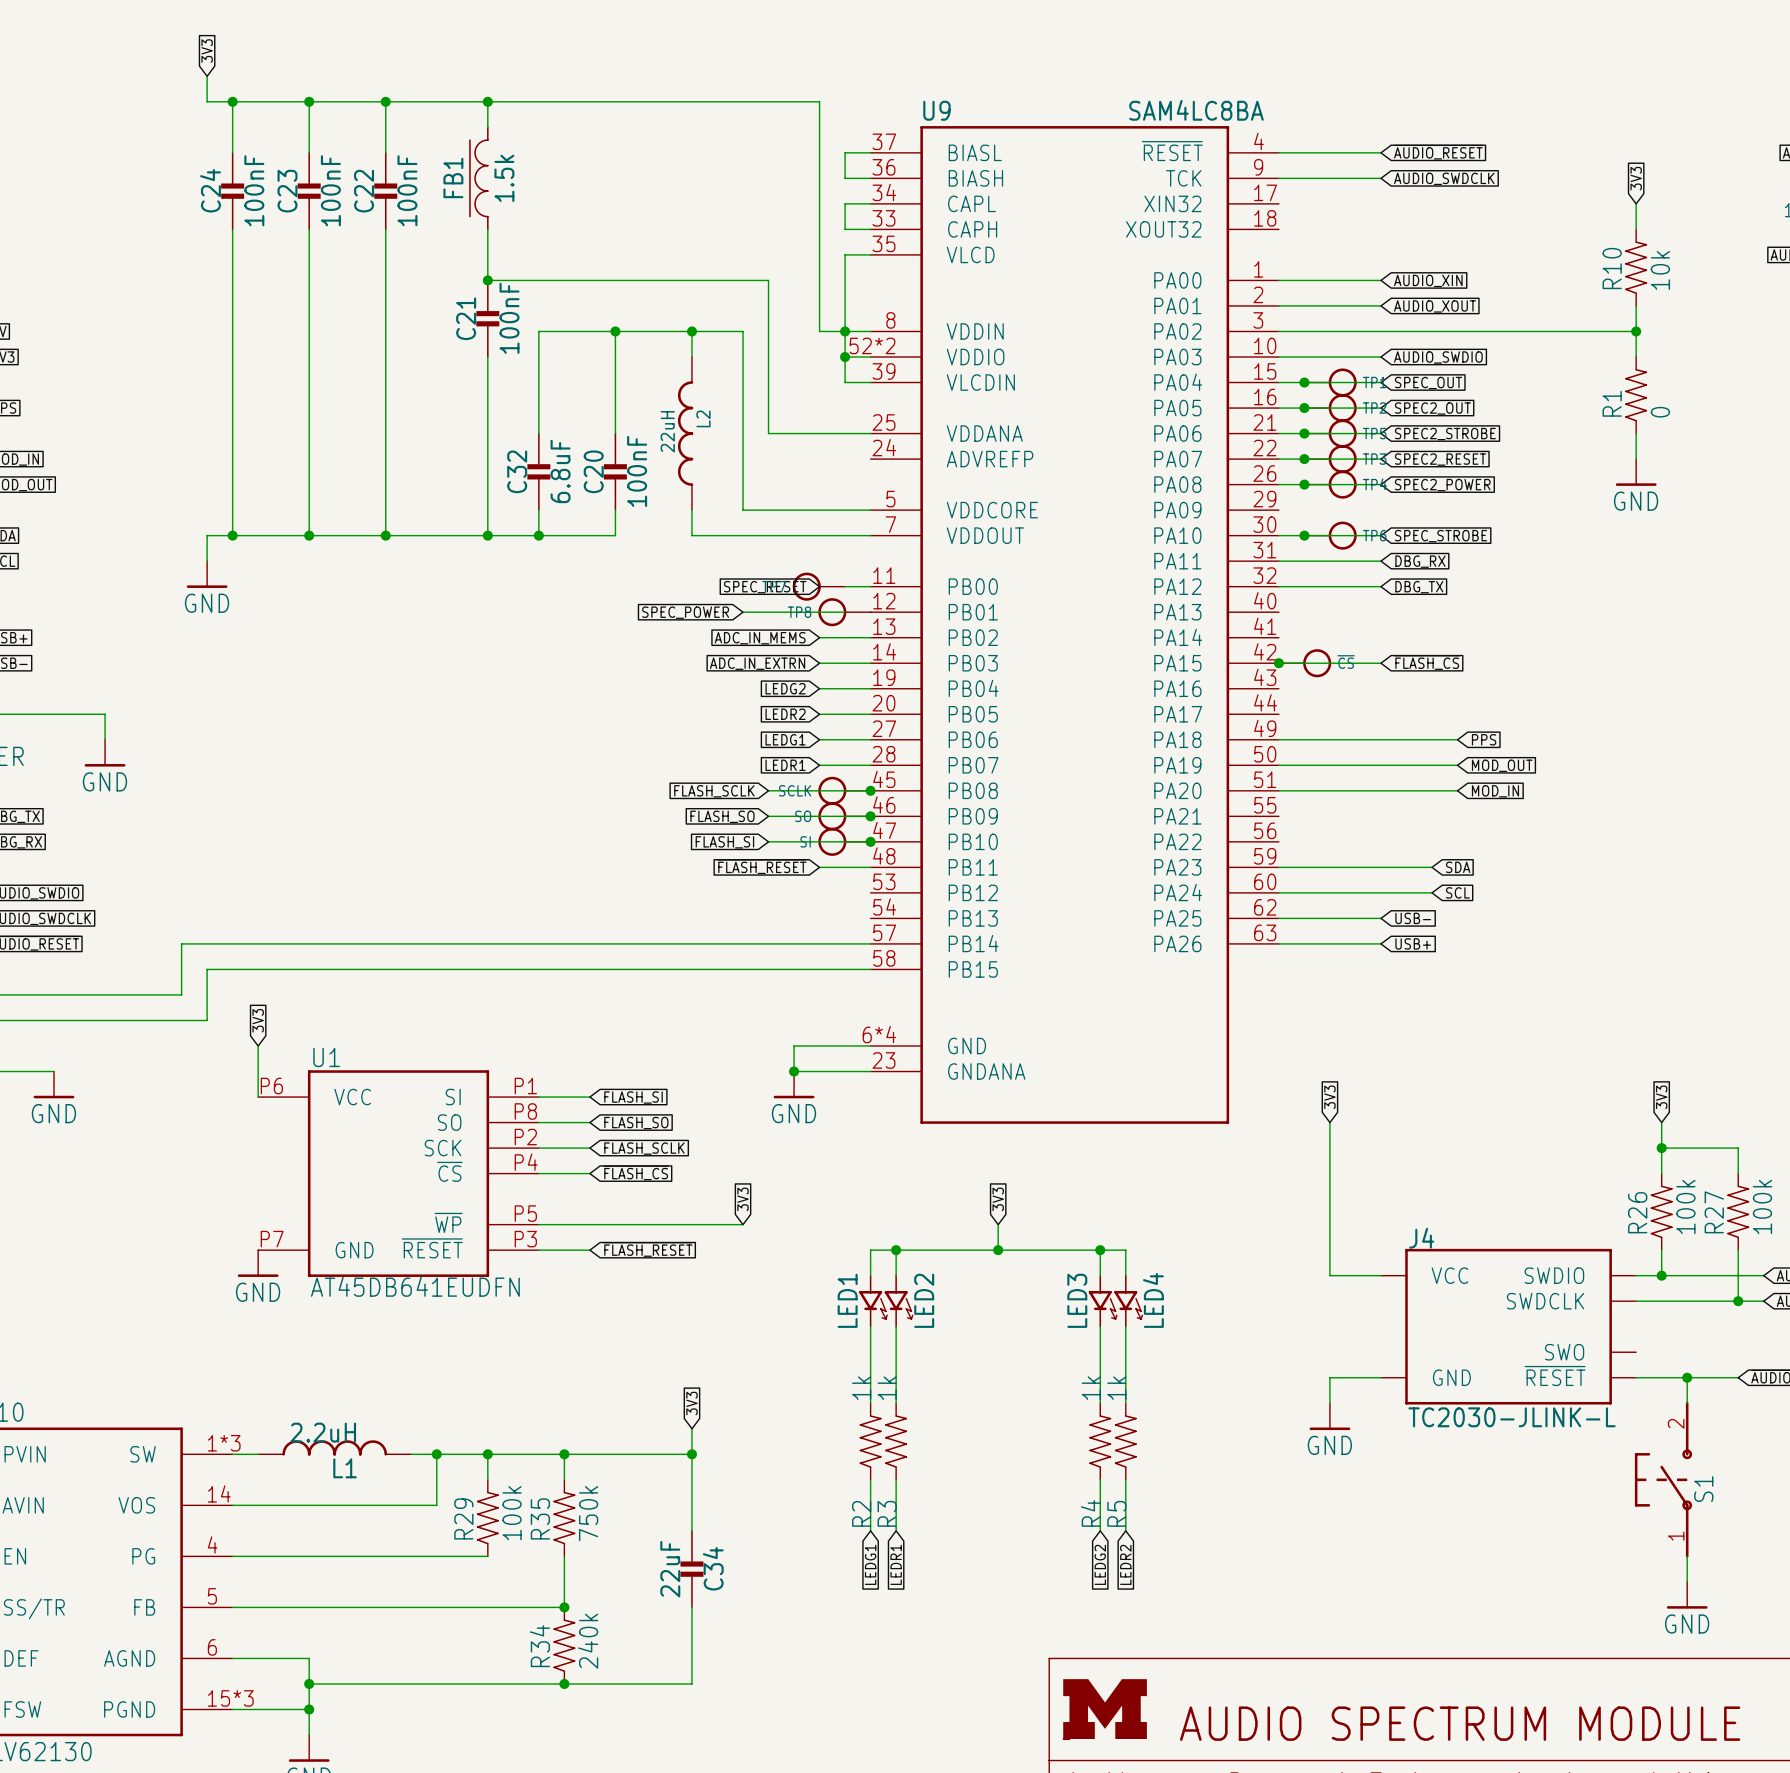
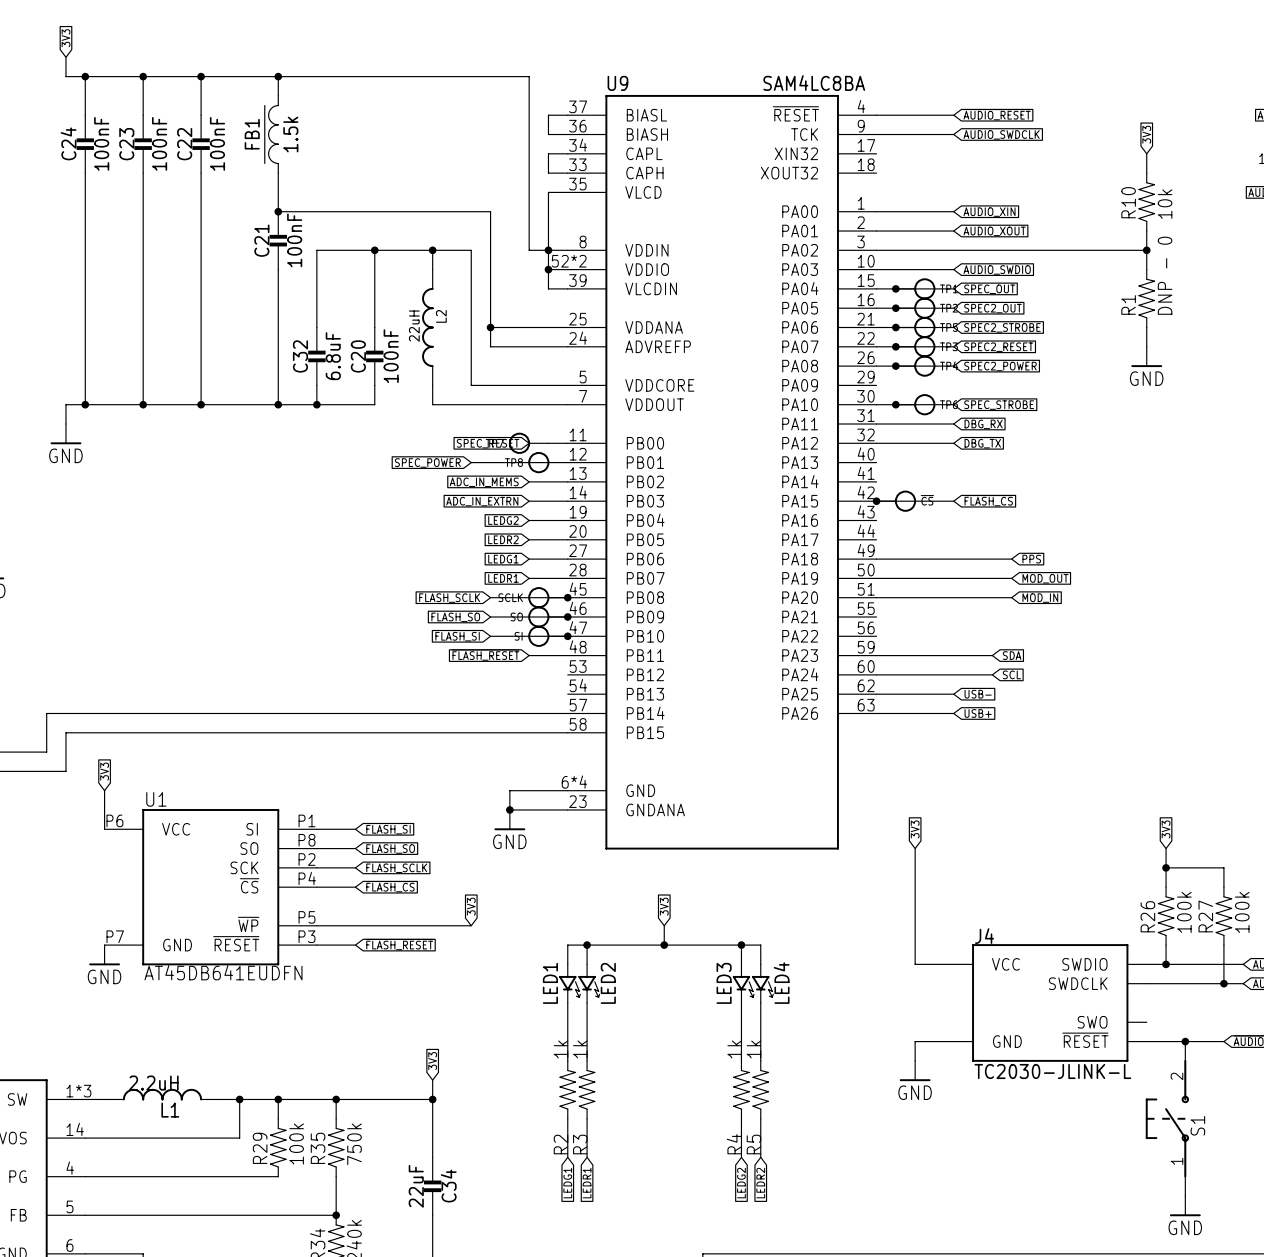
R1 value: 0 (1660, 412) -> DNP - 0 (1165, 275)
wire: none -> (490, 327) (490, 346) (567, 346)
junction: none -> (490, 327)

